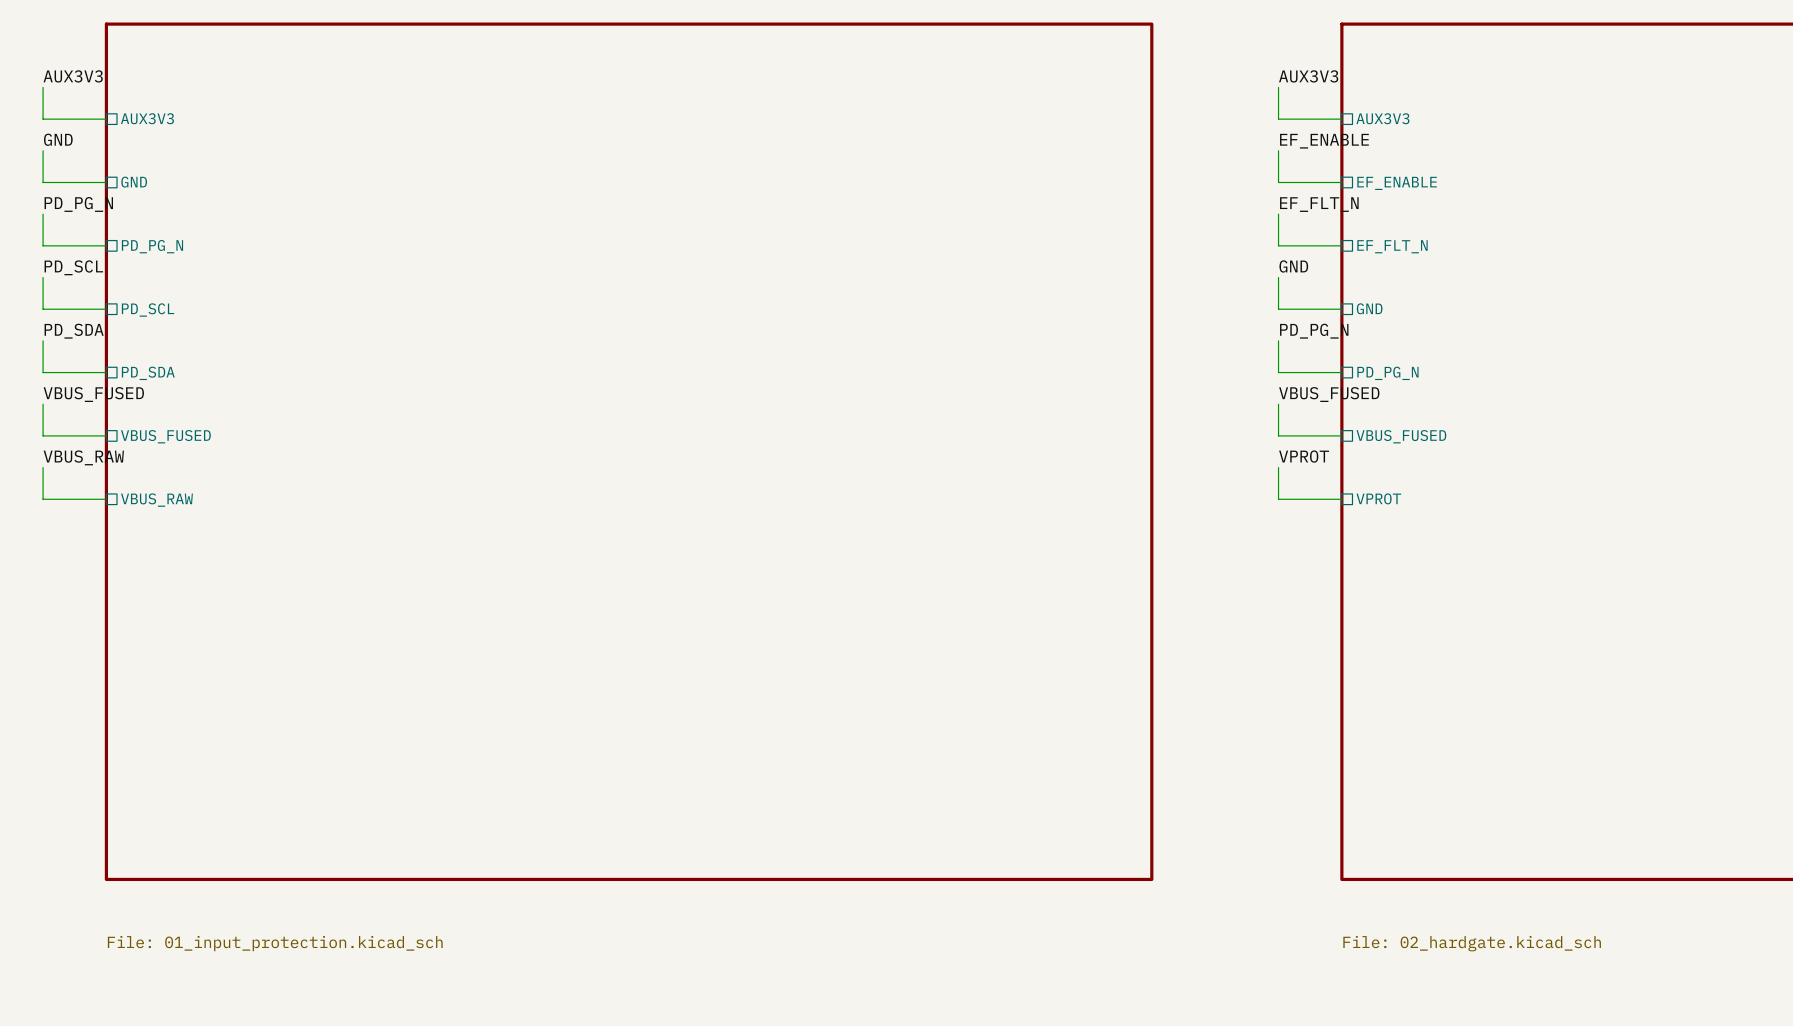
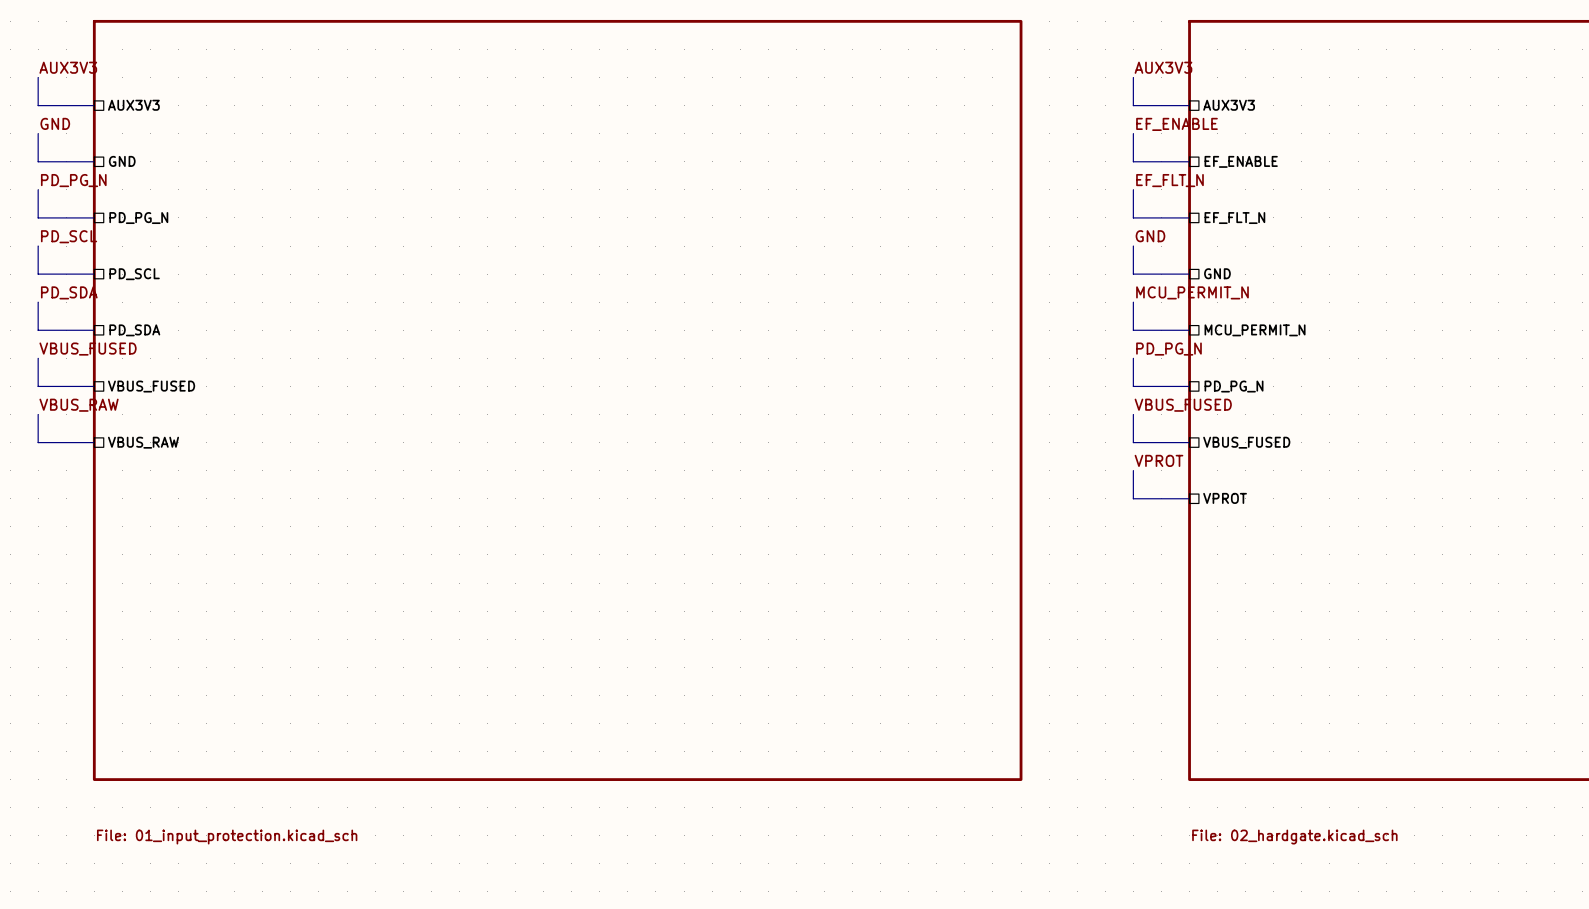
label: PD_PG_N (1314, 331) -> MCU_PERMIT_N (1192, 292)
sheet pin: PD_PG_N (1387, 373) -> MCU_PERMIT_N (1255, 330)
label: VBUS_FUSED (1329, 394) -> PD_PG_N (1168, 349)
sheet pin: VBUS_FUSED (1401, 436) -> PD_PG_N (1234, 386)
label: VPROT (1304, 456) -> VBUS_FUSED (1183, 405)
sheet pin: VPROT (1378, 498) -> VBUS_FUSED (1246, 442)
label: none -> VPROT (1158, 460)
wire: none -> (1133, 470) (1133, 498) (1189, 498)
sheet pin: none -> VPROT (1225, 498)

